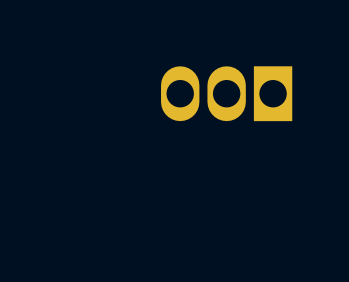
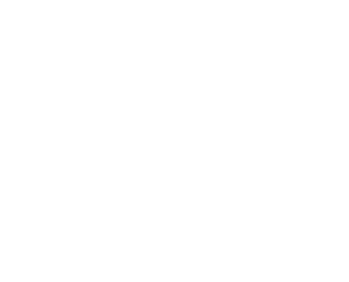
part: (226, 93) -> none

